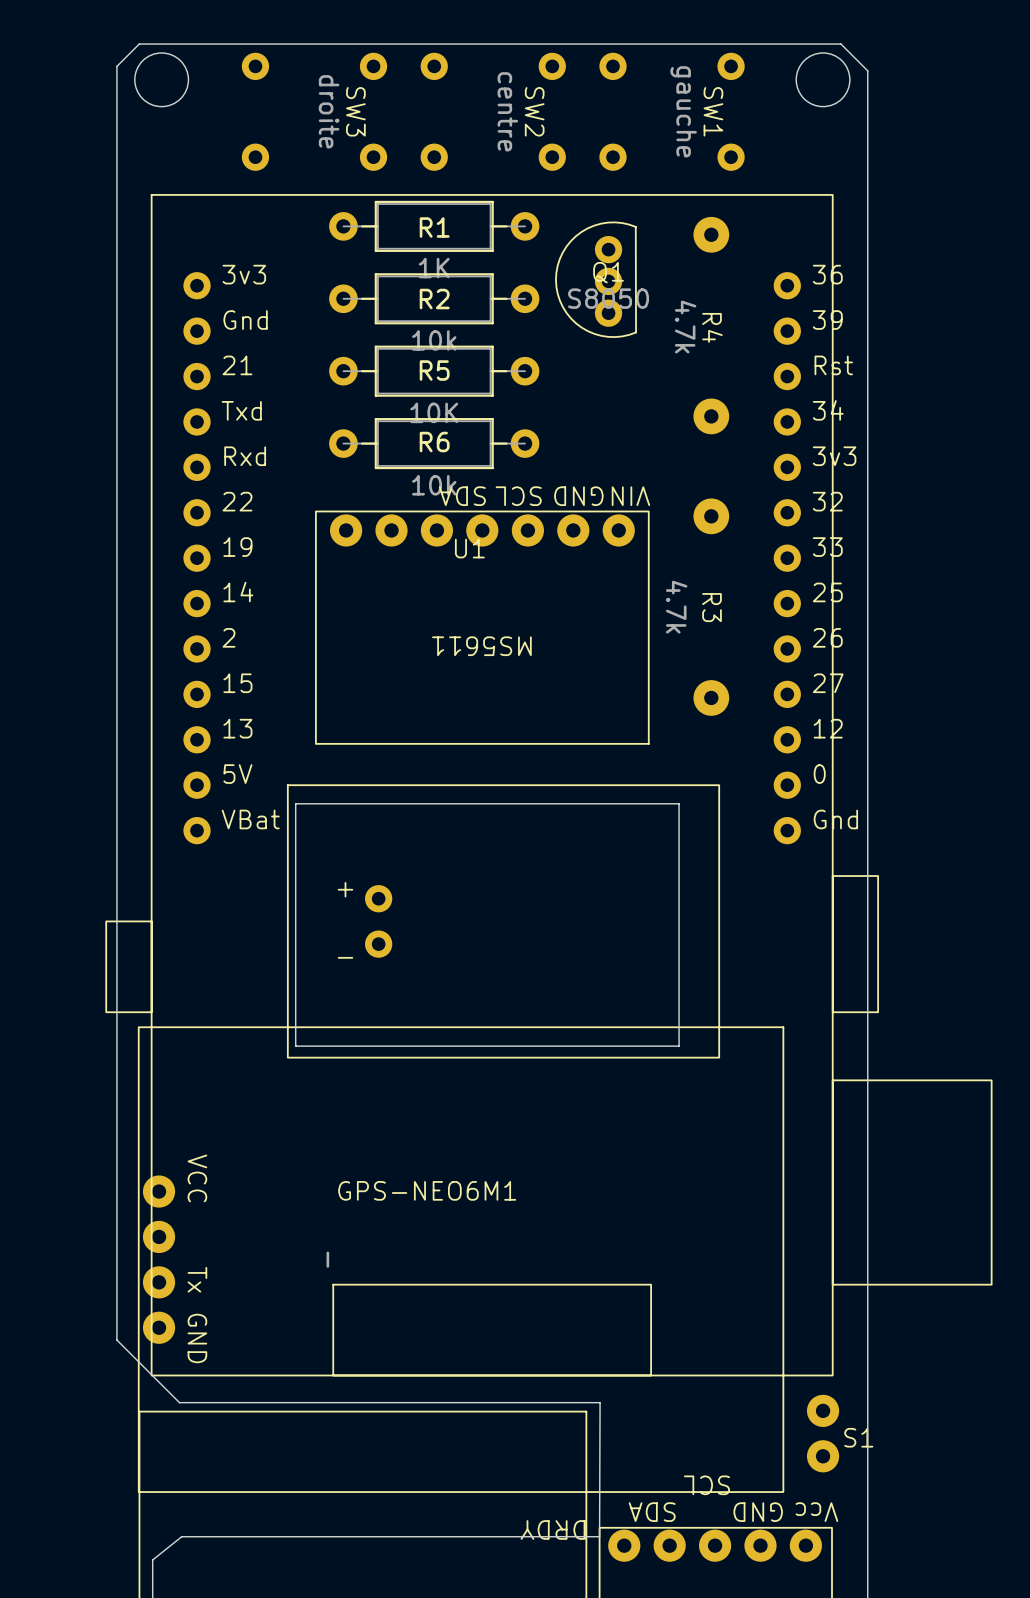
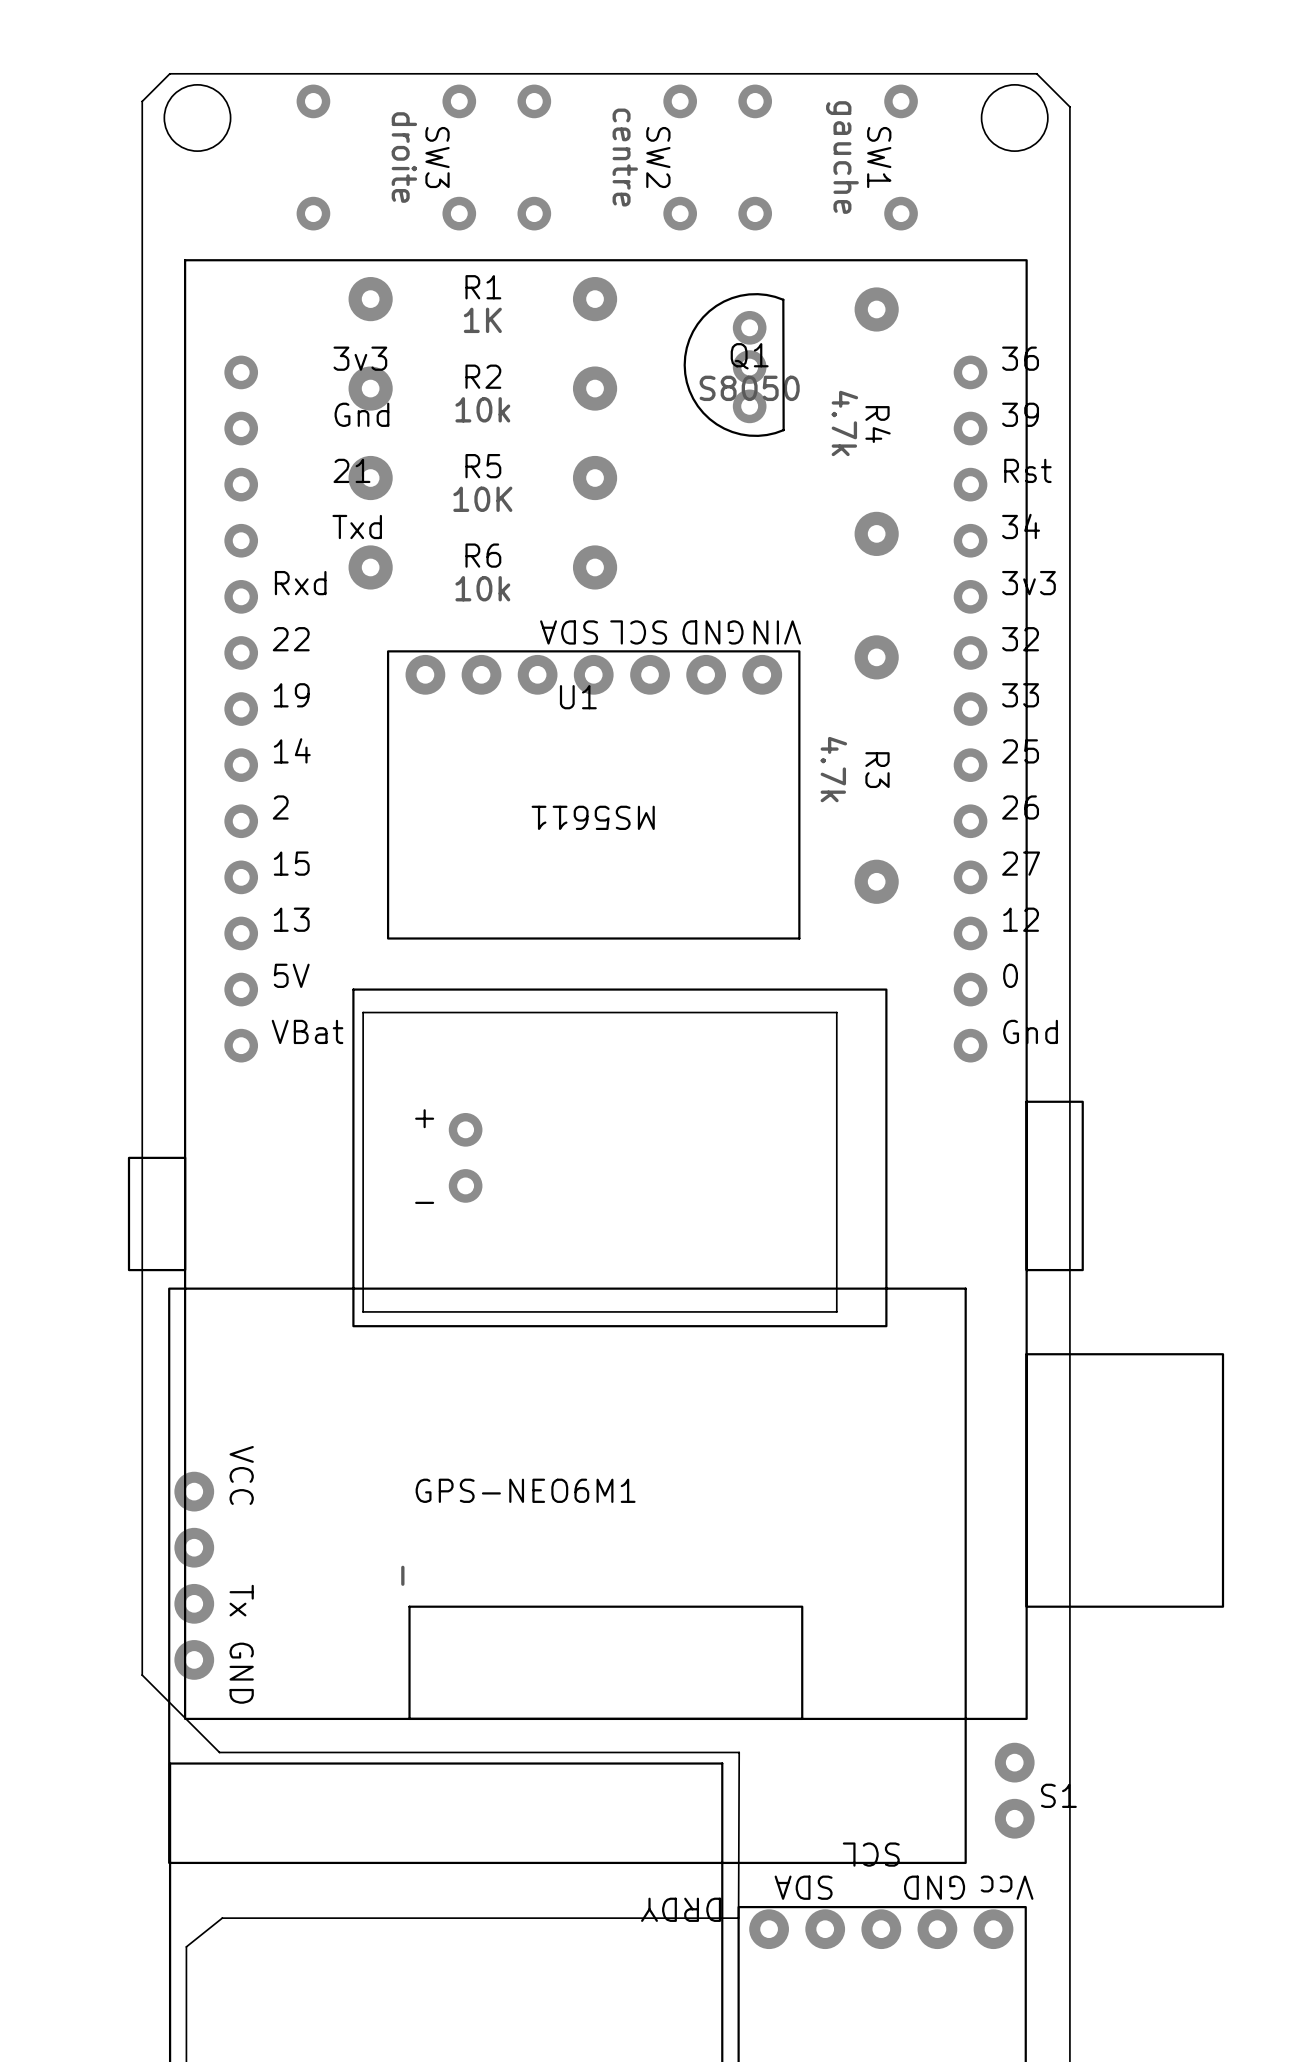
R1 footprint: [329, 200, 540, 252] -> [348, 277, 618, 322]
R2 footprint: [329, 273, 540, 325] -> [348, 366, 618, 411]
U1 text position: 3v3 (244, 274) -> 3v3 (360, 358)
U1 text position: Gnd (245, 320) -> Gnd (361, 414)
R5 footprint: [329, 345, 540, 397] -> [348, 455, 618, 501]
U1 text position: 21 (237, 365) -> 21 (351, 470)
U1 text position: Txd (241, 410) -> Txd (357, 526)
R6 footprint: [329, 418, 540, 470] -> [348, 545, 618, 590]

